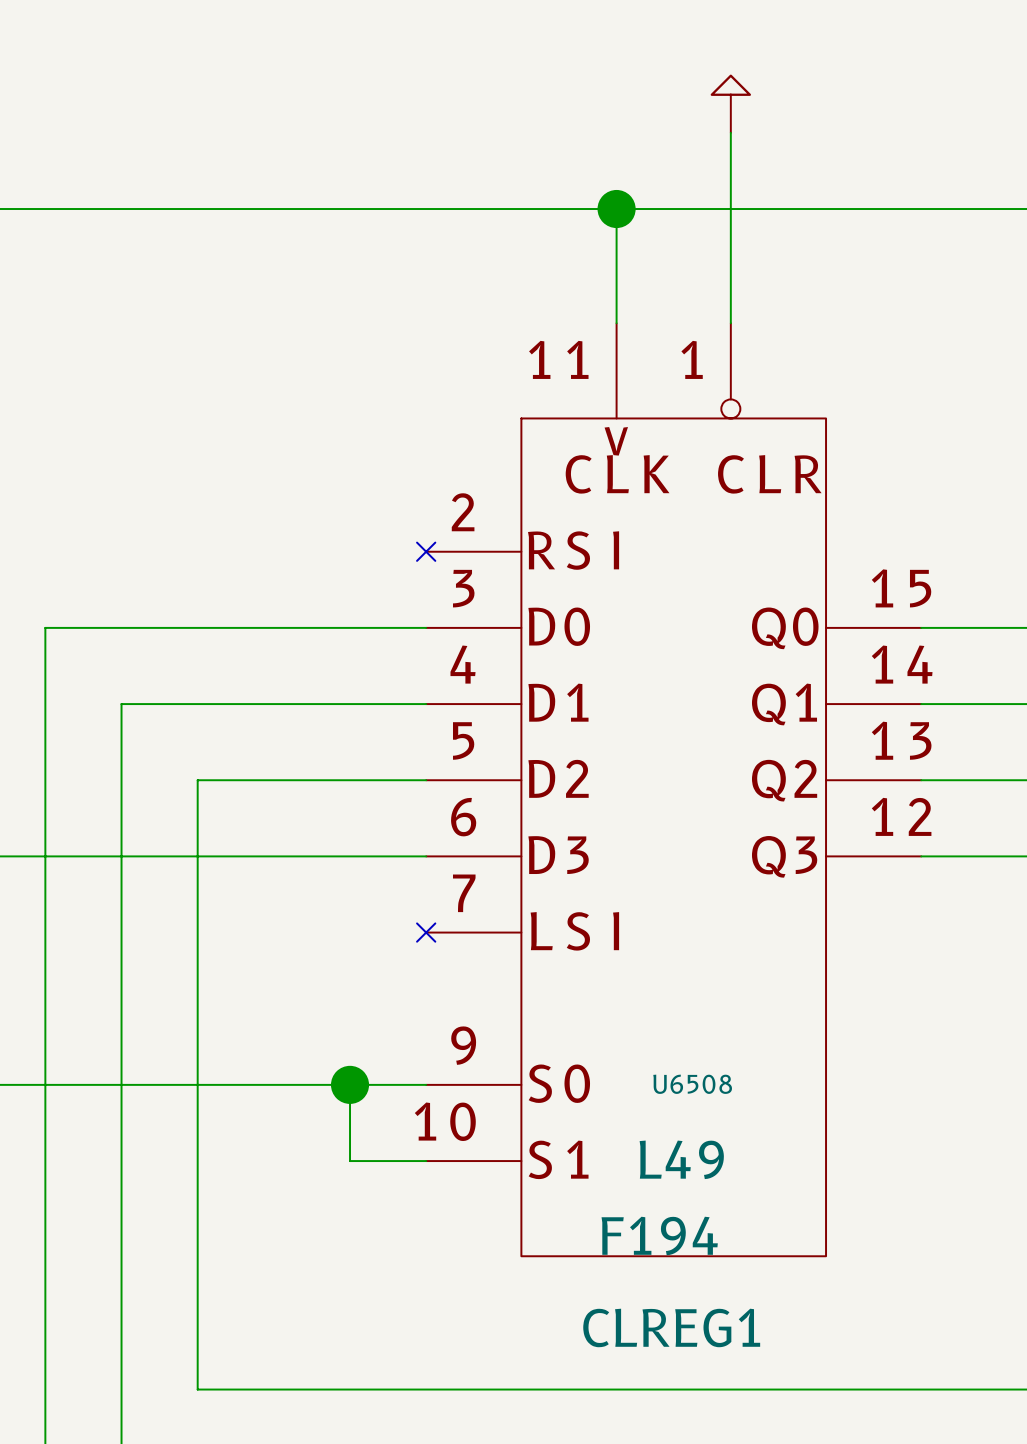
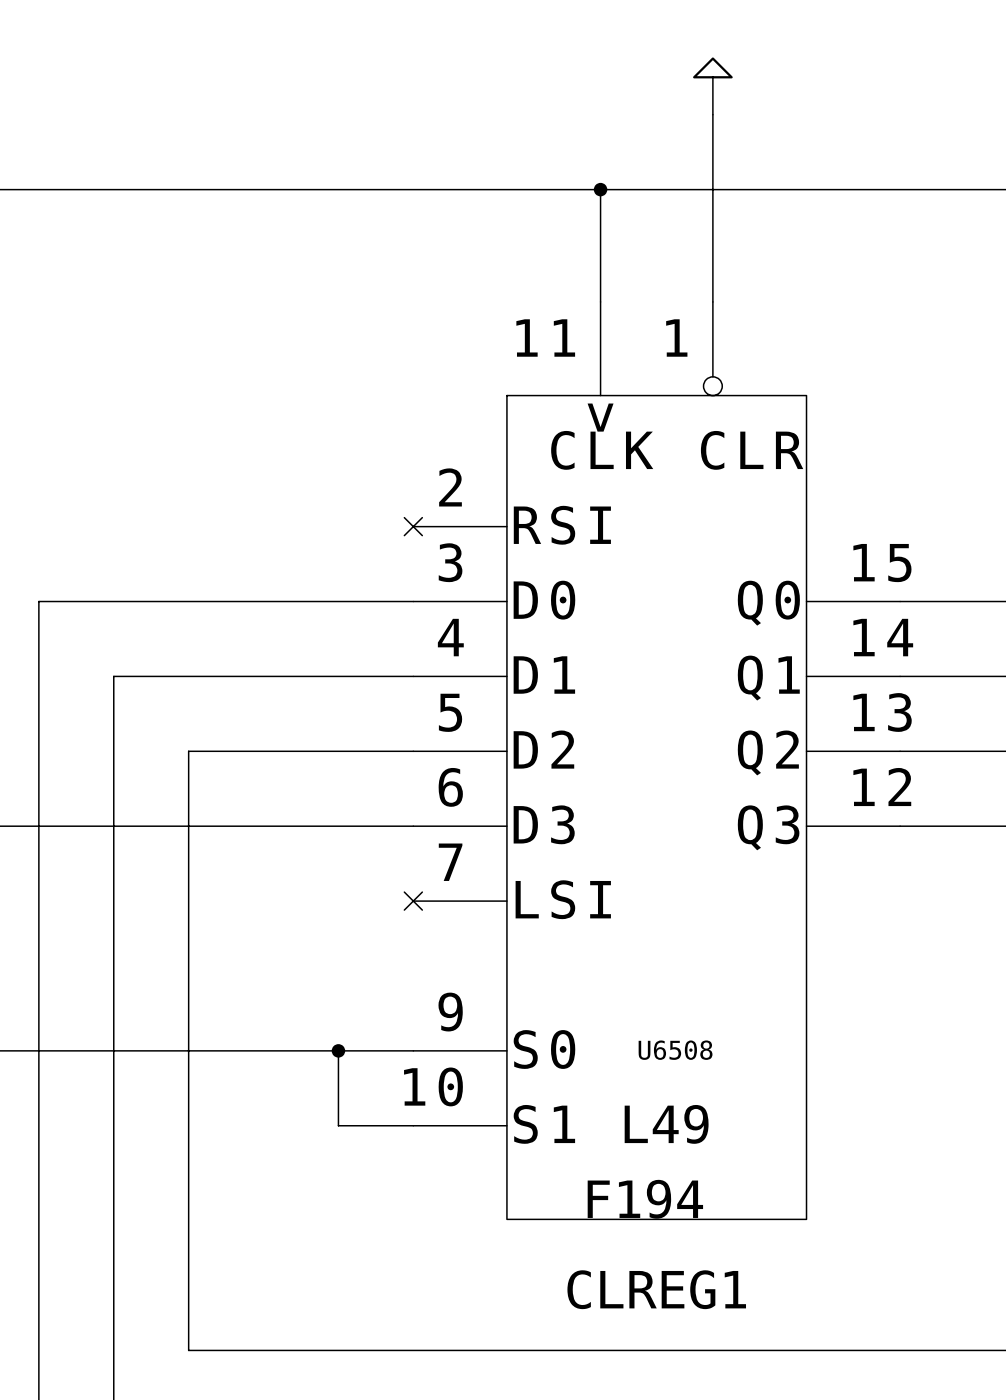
junction size: [597, 189, 636, 229] -> [593, 182, 608, 197]
junction size: [330, 1065, 370, 1104] -> [331, 1044, 346, 1058]

